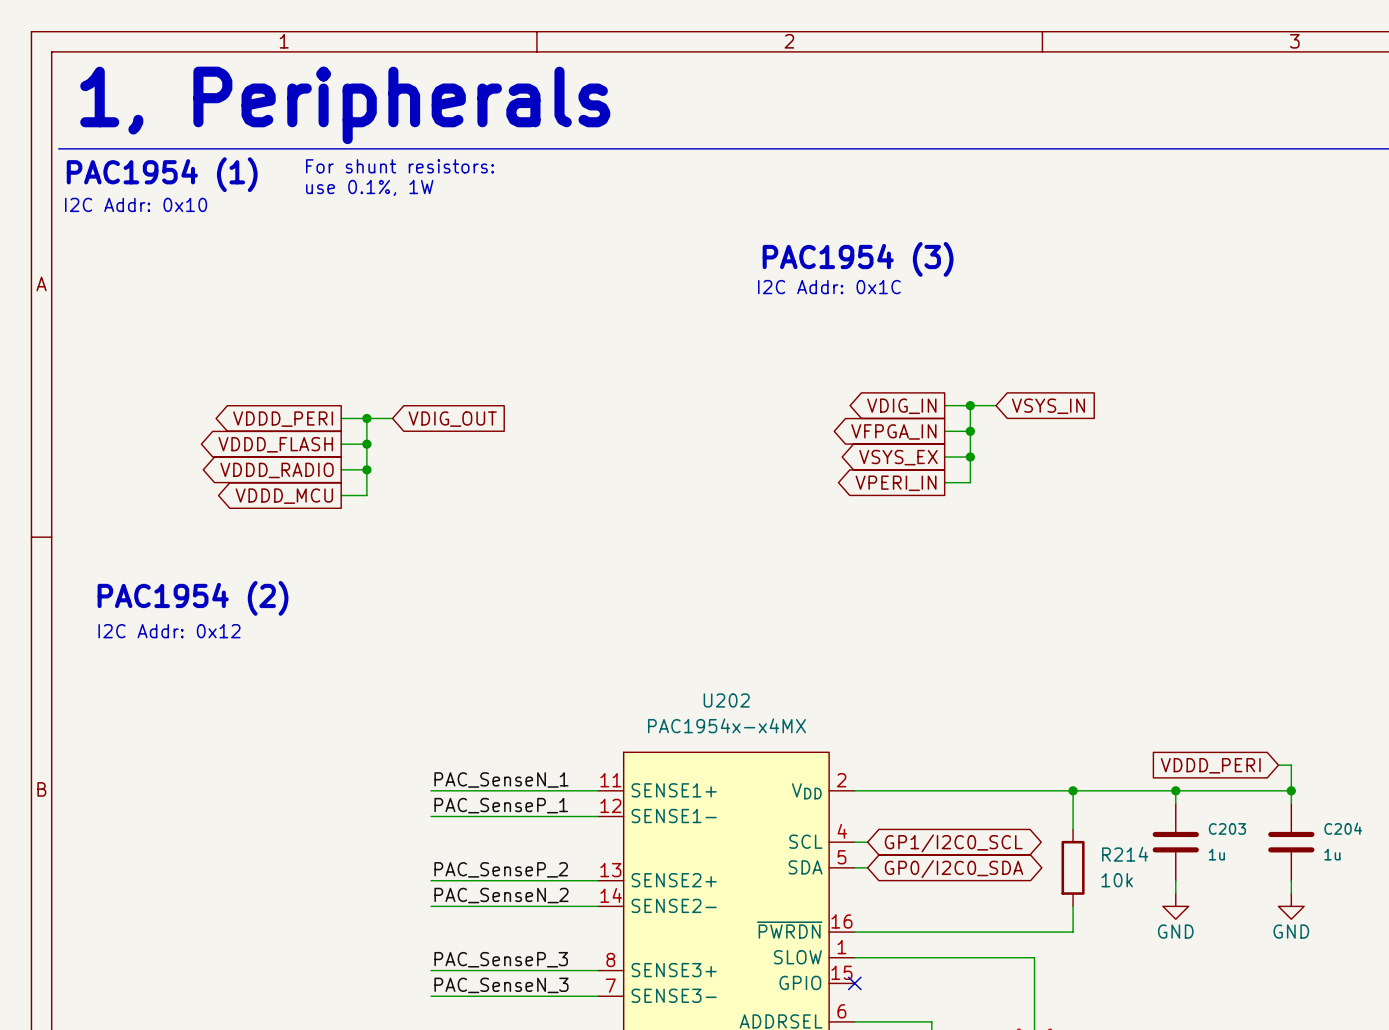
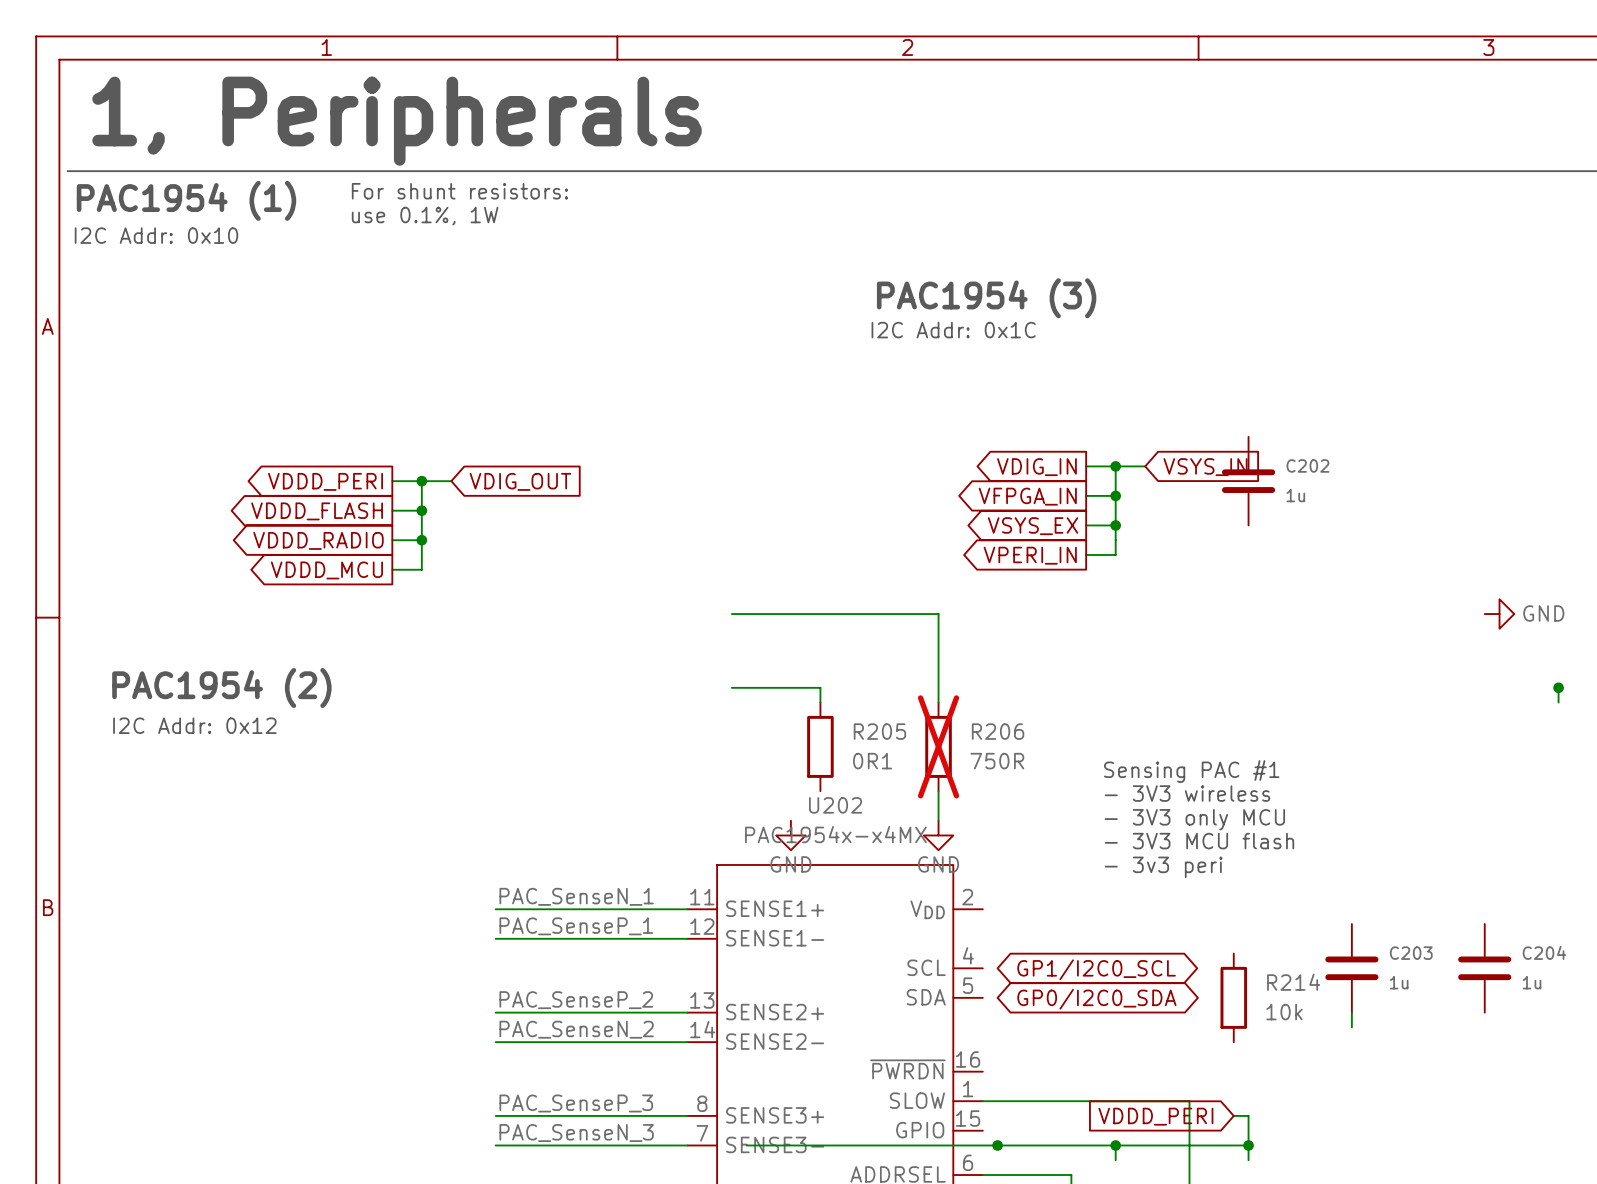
C202: none -> 1u (1248, 481)
wire: none -> (731, 614) (938, 614) (938, 702)
power symbol: none -> GND (1499, 614)
wire: none -> (731, 687) (820, 687) (820, 702)
wire: none -> (1558, 687) (1558, 702)
junction: none -> (1558, 687)
R205: none -> 0R1 (820, 746)
R206: none -> 750R (938, 746)
text: none -> Sensing PAC #1 (1191, 771)
wire: none -> (938, 791) (938, 820)
text: none -> - 3V3 wireless (1187, 793)
text: none -> - 3V3 only MCU (1194, 819)
power symbol: none -> GND (790, 835)
power symbol: none -> GND (938, 835)
text: none -> - 3V3 MCU flash (1199, 841)
text: none -> - 3v3 peri (1163, 867)
global label: VDDD_PERI (1210, 765) -> none
wire: (1278, 765) (1291, 765) (1291, 803) -> none
wire: (854, 790) (1291, 790) -> none
wire: (1073, 790) (1073, 829) -> none
junction: (1073, 790) -> none
wire: (1175, 790) (1175, 803) -> none
junction: (1175, 790) -> none
junction: (1291, 790) -> none
wire: (854, 842) (867, 842) -> none
wire: (854, 867) (867, 867) -> none
wire: (1291, 880) (1291, 893) -> none
wire: (1073, 906) (1073, 932) (854, 932) -> none
power symbol: GND (1175, 906) -> none
power symbol: GND (1291, 906) -> none
wire: none -> (1233, 1115) (1248, 1115) (1248, 1160)
global label: none -> VDDD_PERI (1155, 1116)
no-connect mark: (854, 983) -> none
wire: none -> (746, 1145) (1248, 1145)
junction: none -> (997, 1145)
wire: none -> (1115, 1145) (1115, 1160)
junction: none -> (1115, 1145)
junction: none -> (1248, 1145)

